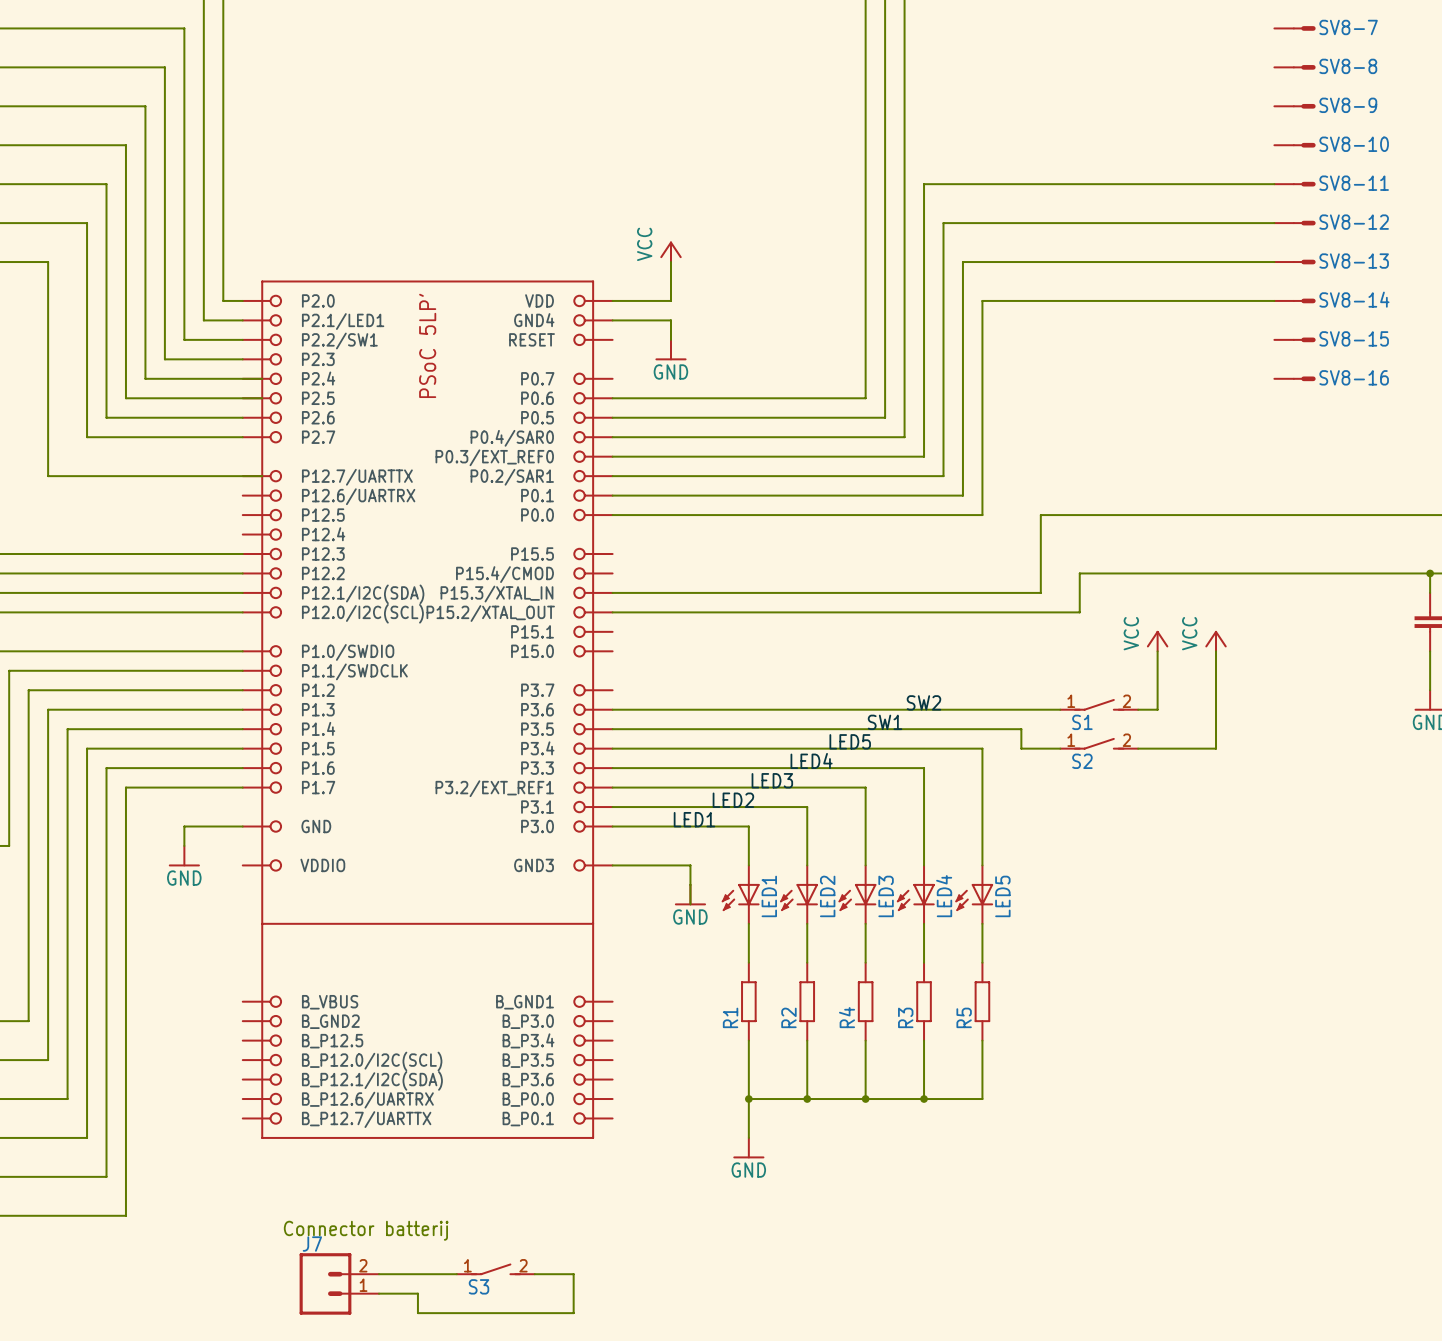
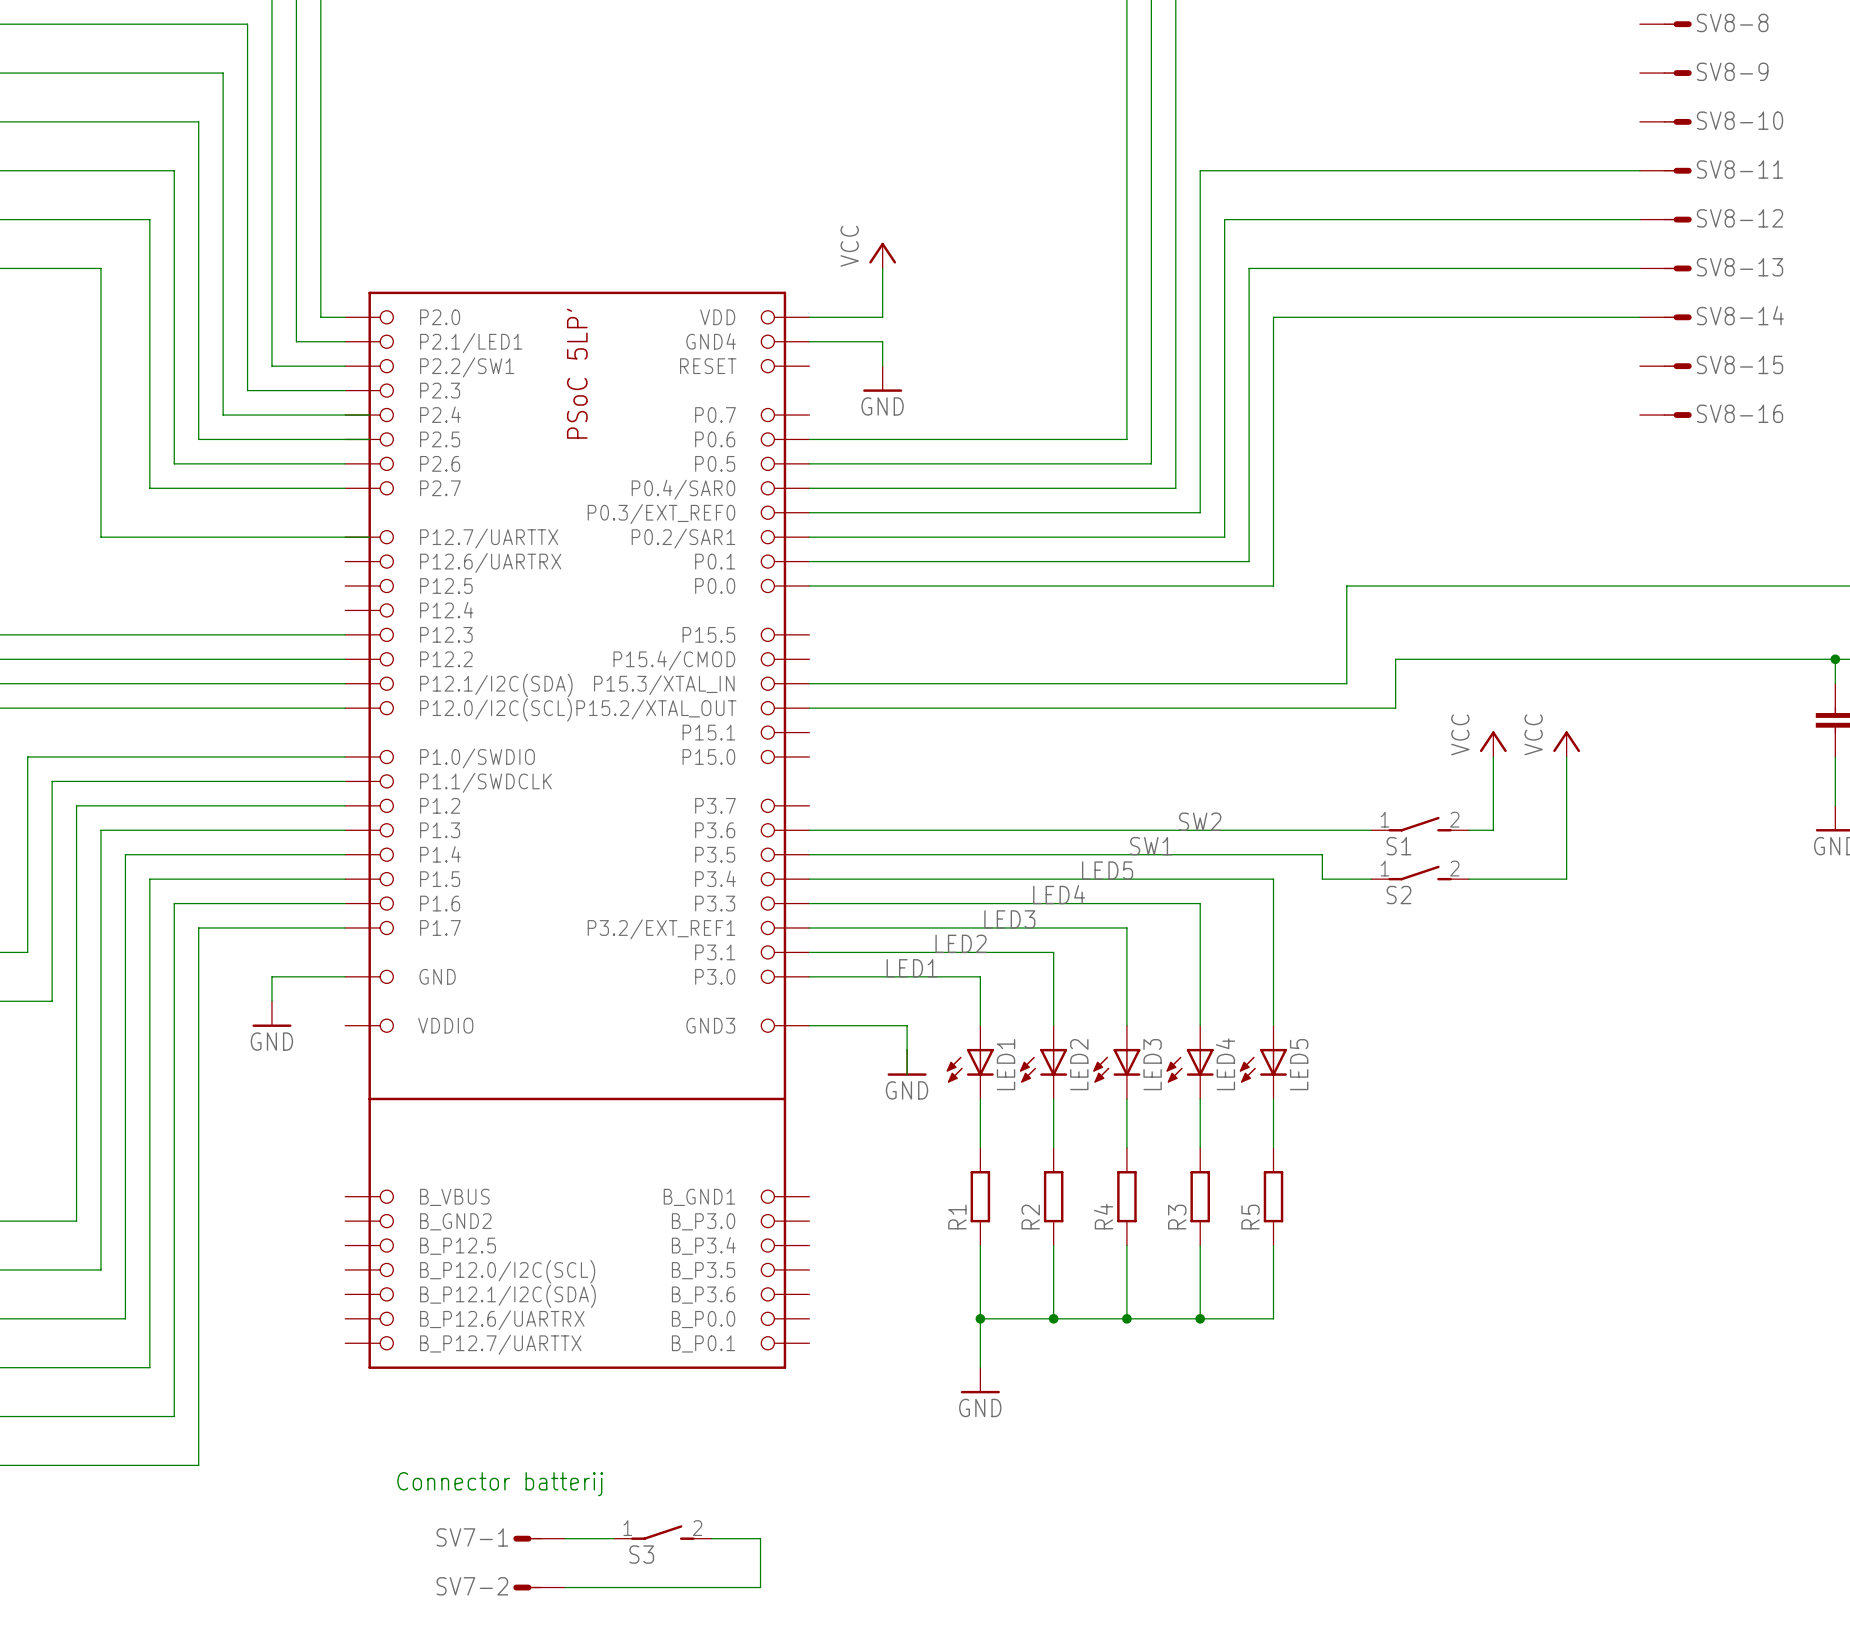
SV7-1: none -> (539, 1538)
J7: (339, 1283) -> none
wire: (379, 1293) (417, 1293) (417, 1313) -> none
SV7-2: none -> (539, 1587)

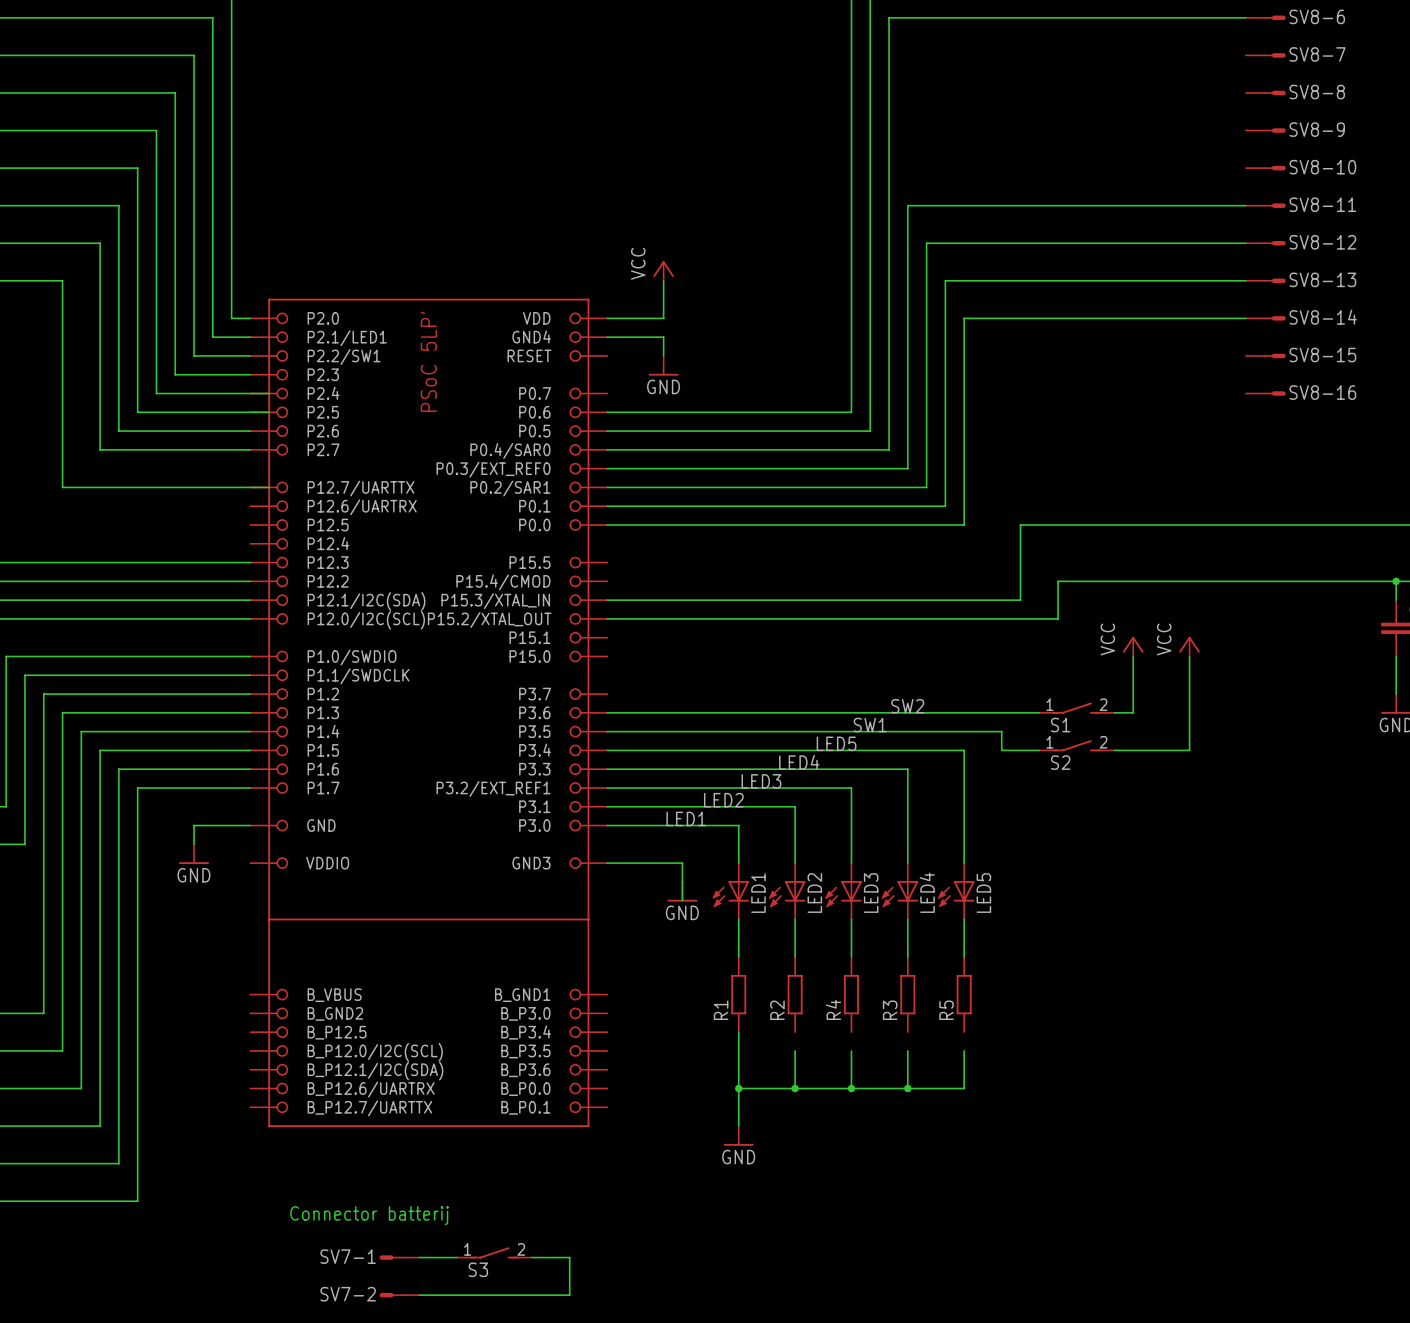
wire: (1053, 1245) (1053, 1269) -> none
wire: (1126, 1245) (1126, 1269) -> none
wire: (1200, 1245) (1200, 1269) -> none
wire: (1273, 1245) (1273, 1269) -> none

